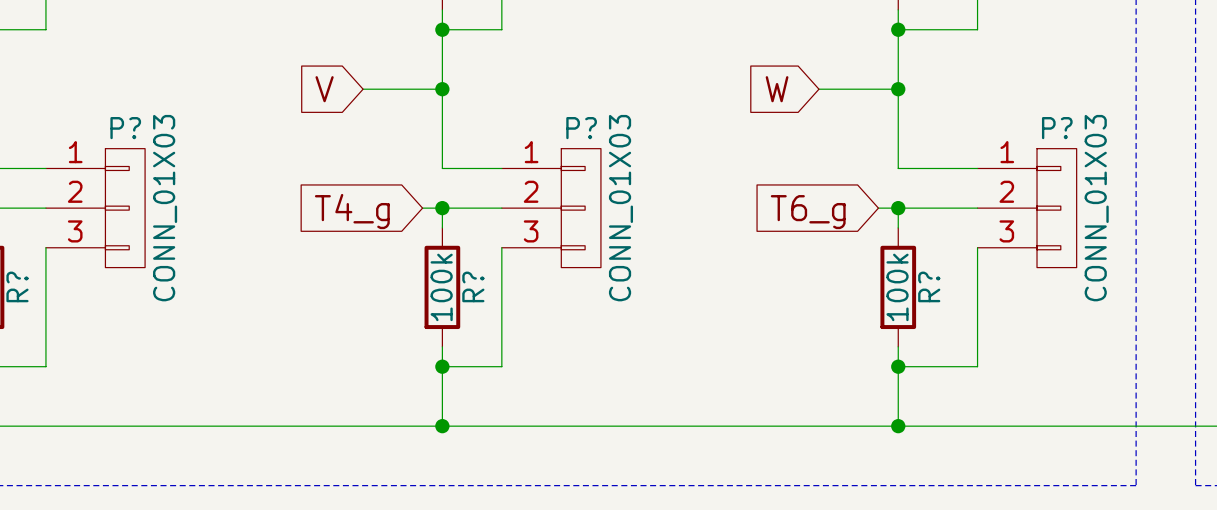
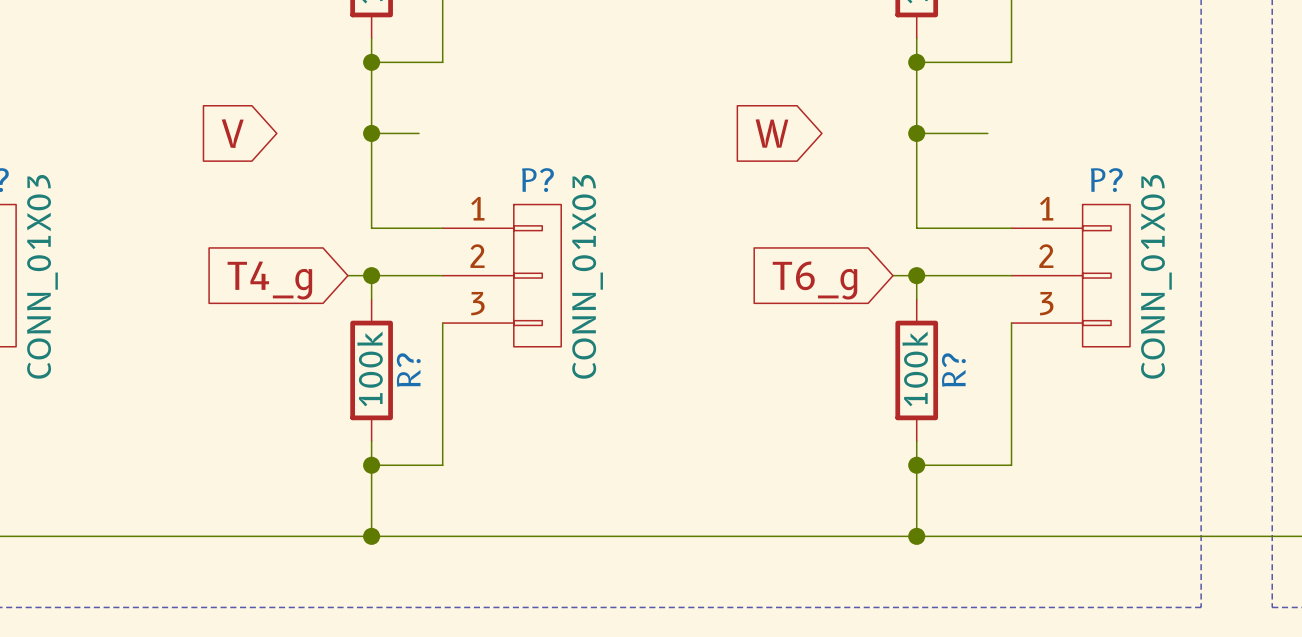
wire: (363, 89) (442, 89) -> (419, 133) (371, 133)
wire: (818, 89) (898, 89) -> (987, 133) (916, 133)

